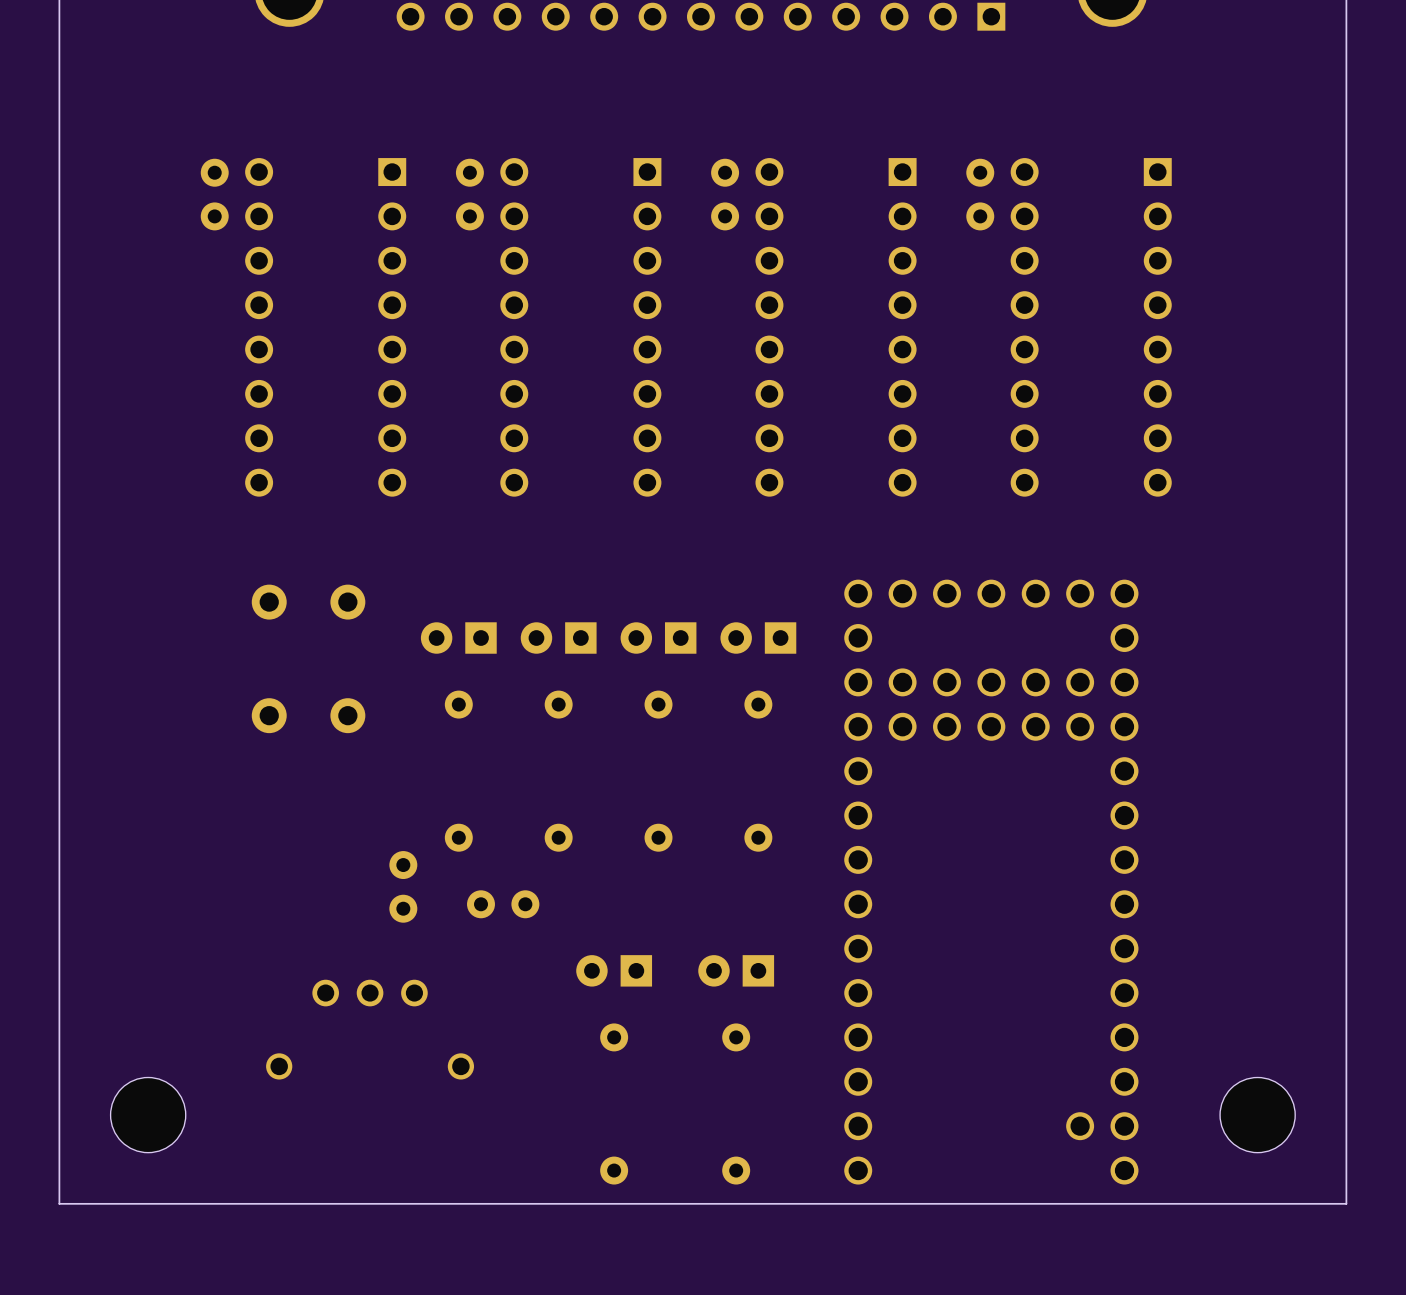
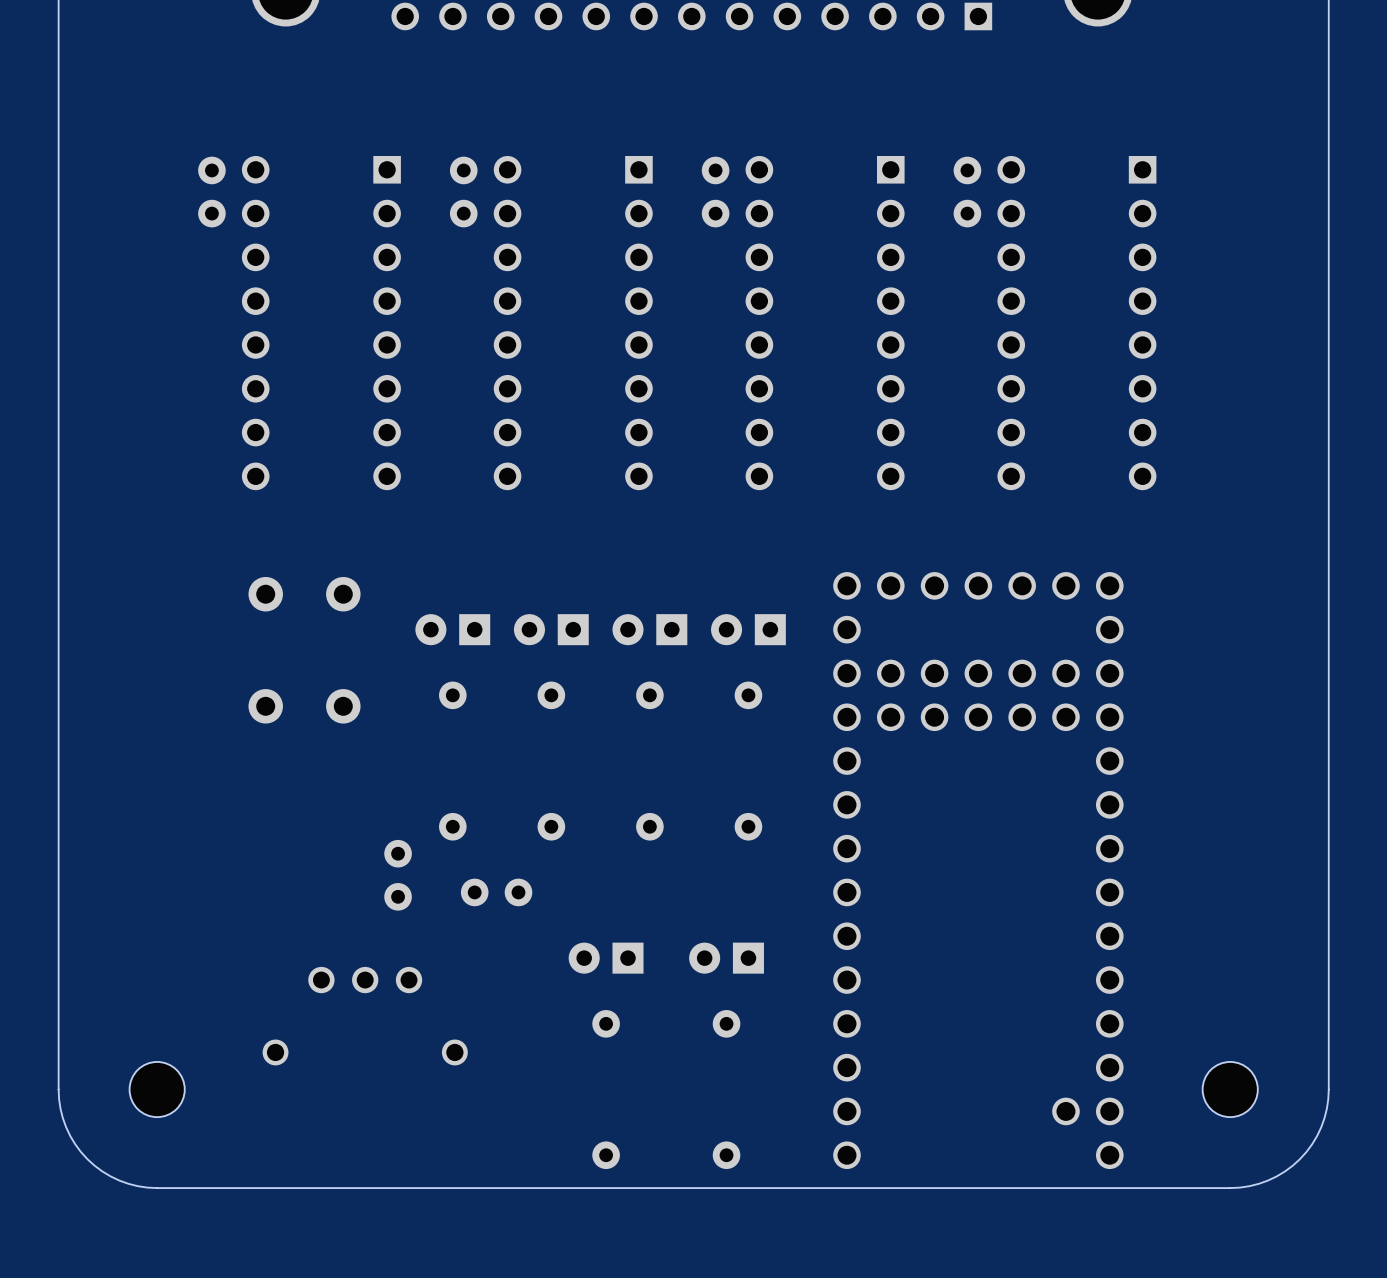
part footprint: [110, 1077, 186, 1153] -> [129, 1061, 185, 1118]
part footprint: [1220, 1077, 1296, 1153] -> [1202, 1061, 1258, 1118]
board edge: (59, 1103) (59, 1203) (159, 1203) -> (58, 1089) (60, 1108) (66, 1127) (75, 1144) (87, 1159) (102, 1171) (119, 1180) (137, 1186) (157, 1188)
board edge: (1346, 1103) (1346, 1203) (1246, 1203) -> (1328, 1089) (1326, 1108) (1321, 1127) (1312, 1144) (1299, 1159) (1284, 1171) (1267, 1180) (1249, 1186) (1230, 1188)

